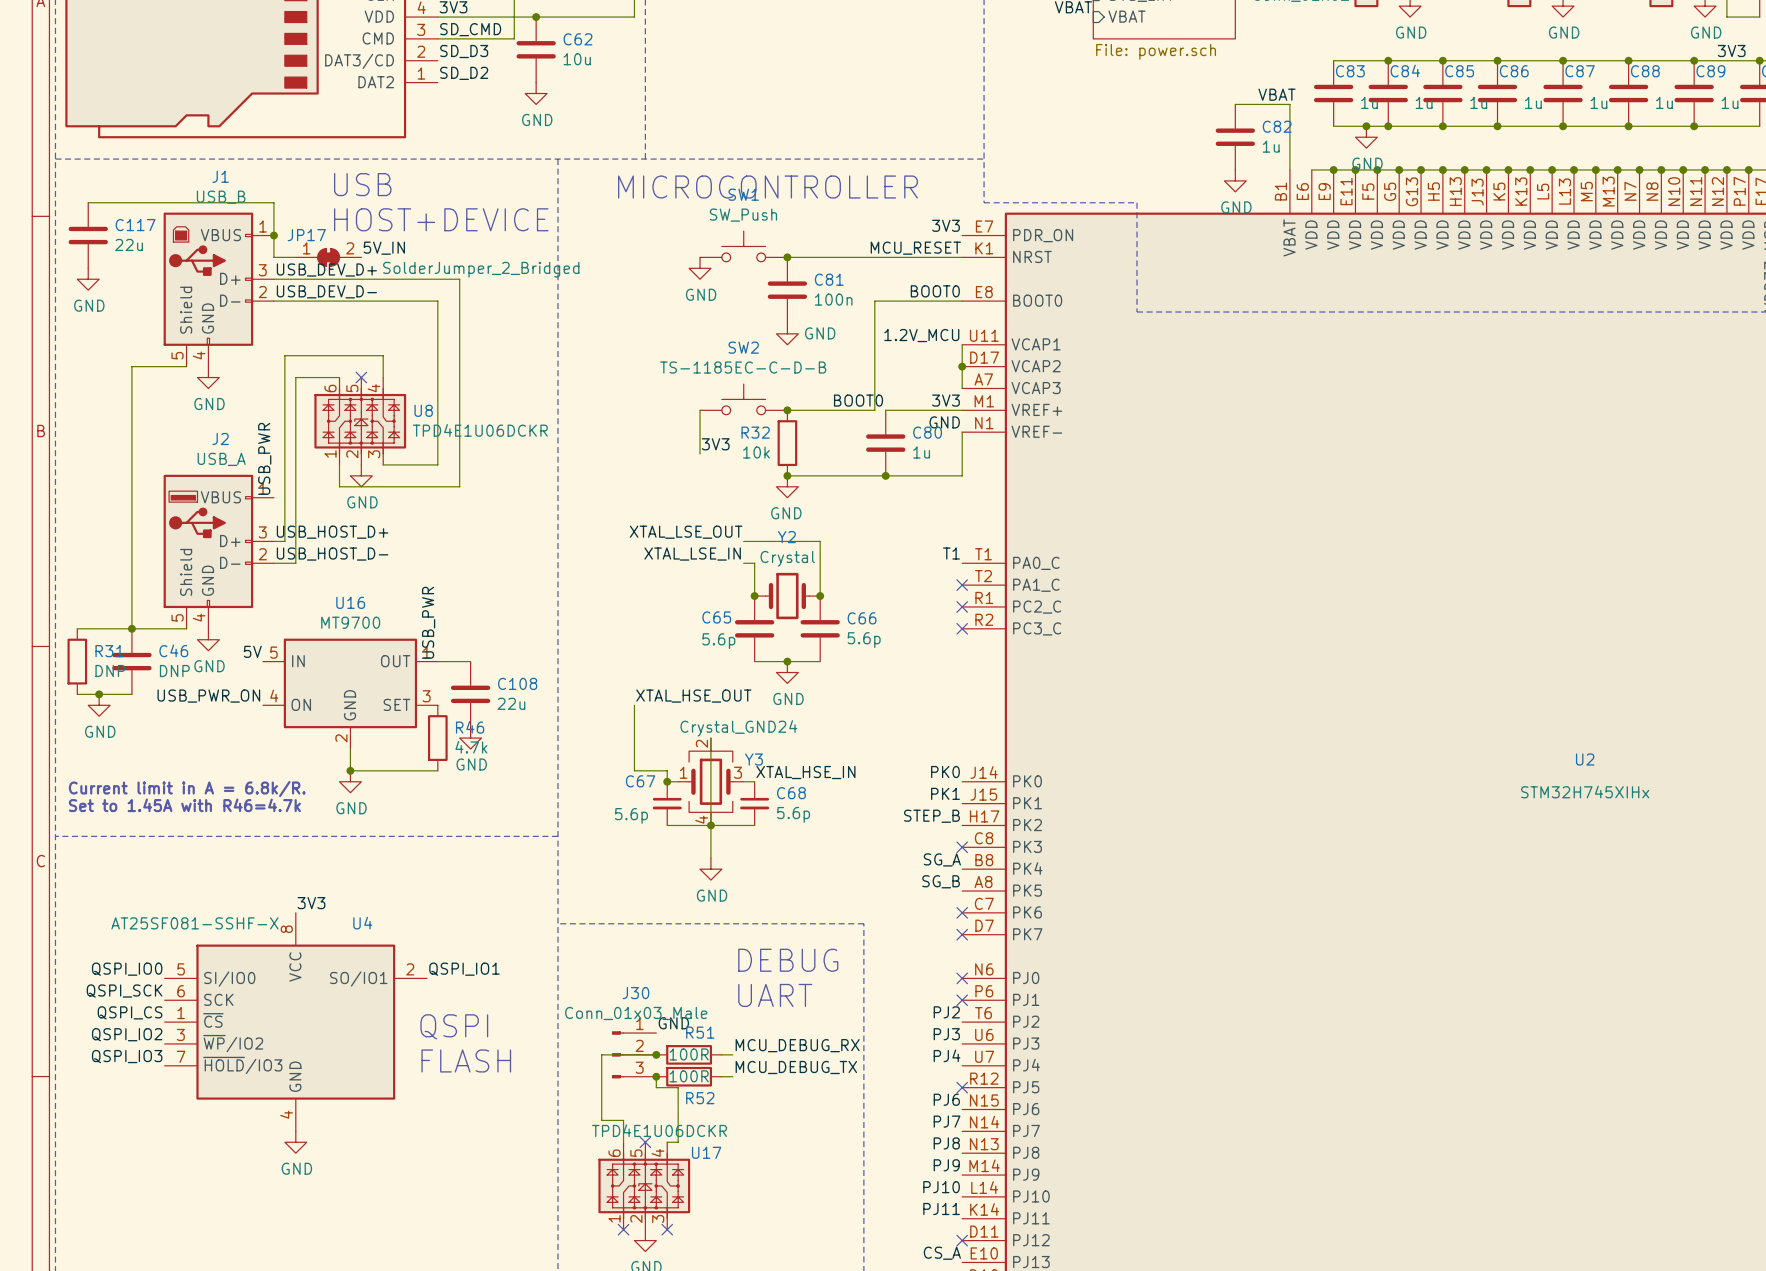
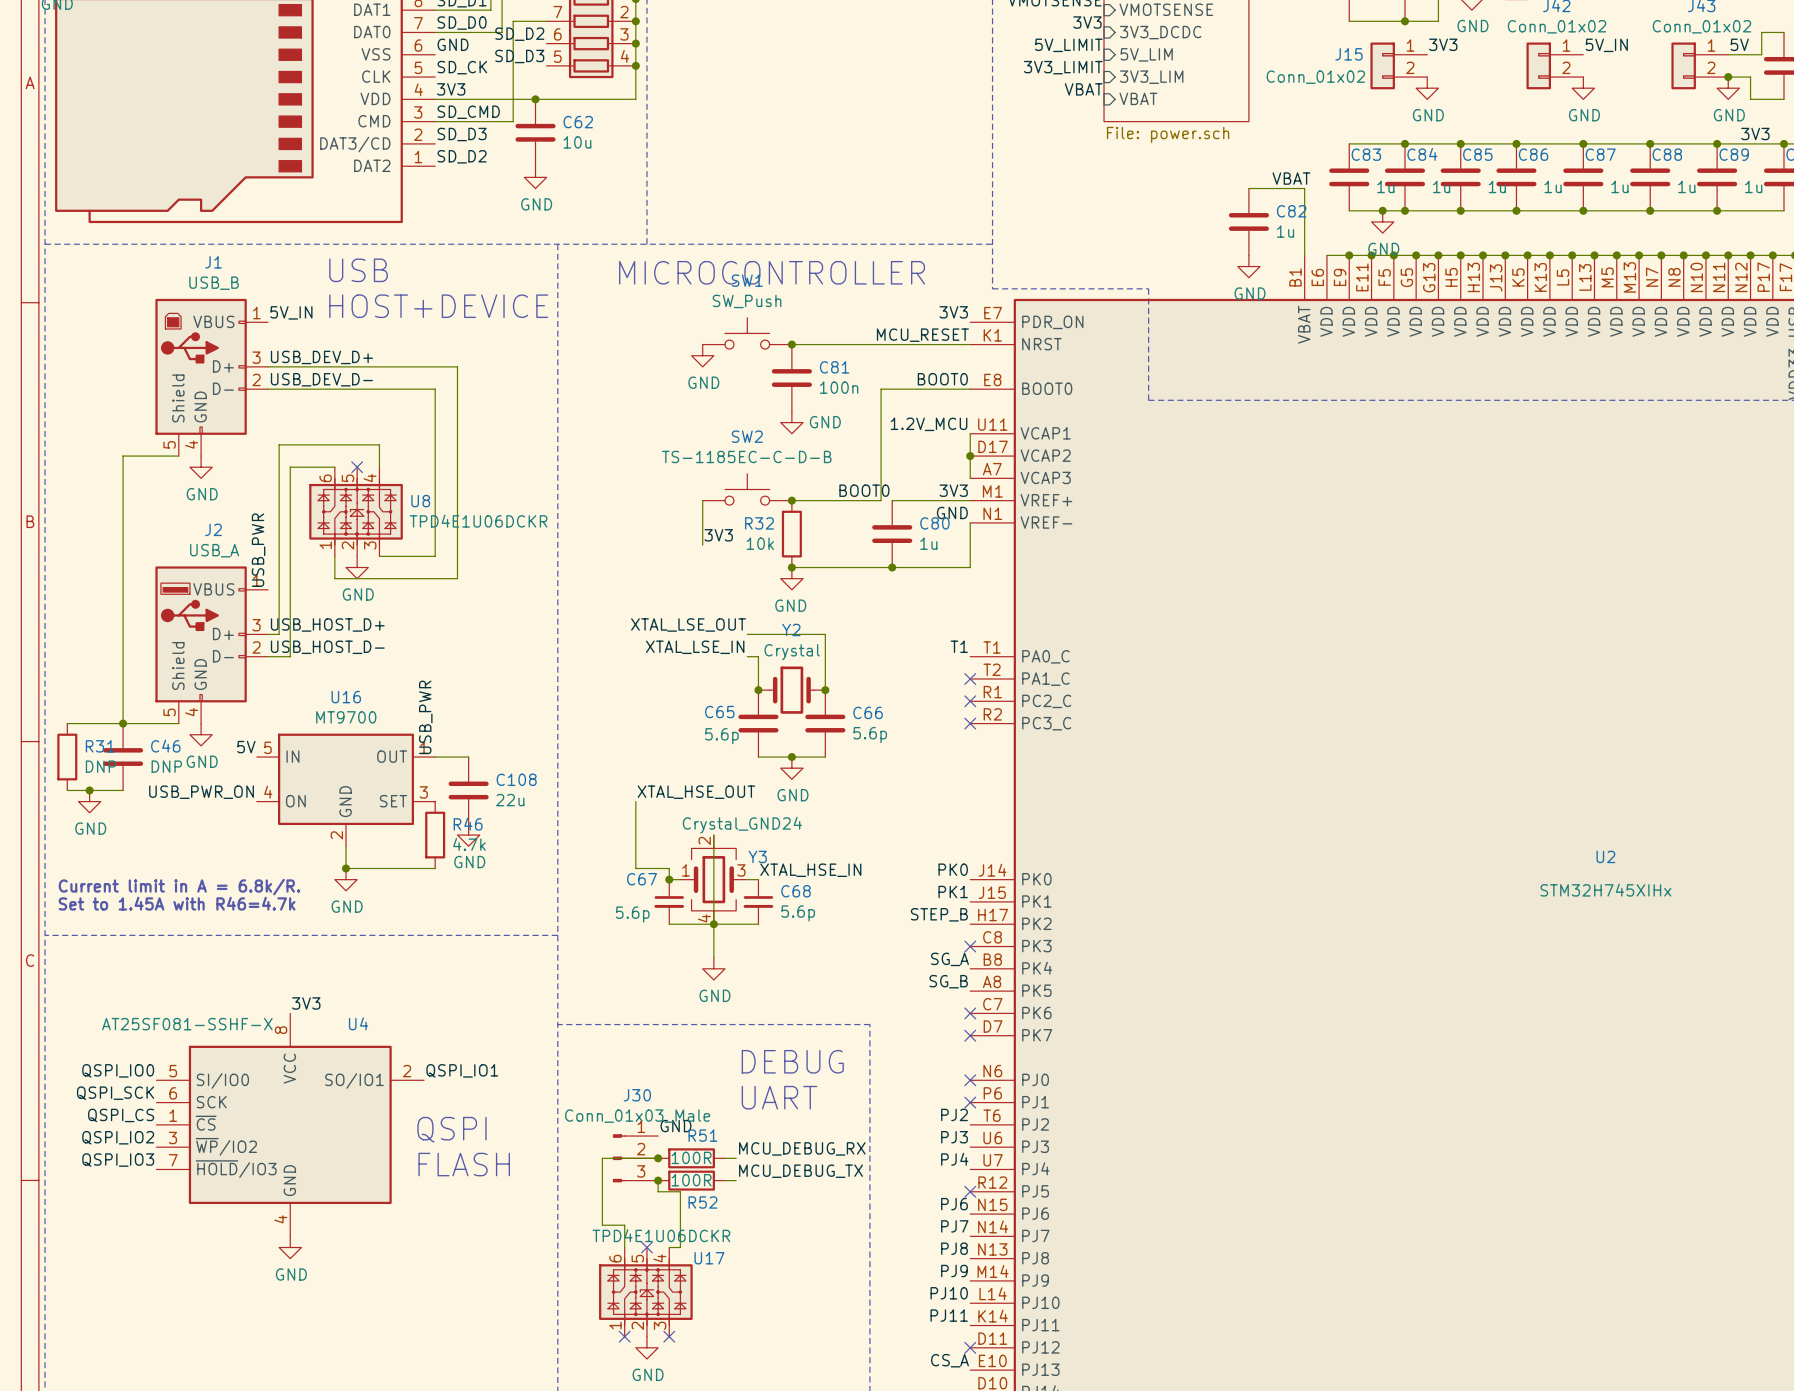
wire: (88, 202) (273, 202) (273, 257) (295, 257) -> none
C117: 22u (88, 235) -> none
junction: (273, 235) -> none
label position: 5V_IN (384, 248) -> 5V_IN (291, 312)
JP17: SolderJumper_2_Bridged (328, 257) -> none
power symbol: GND (88, 279) -> none

